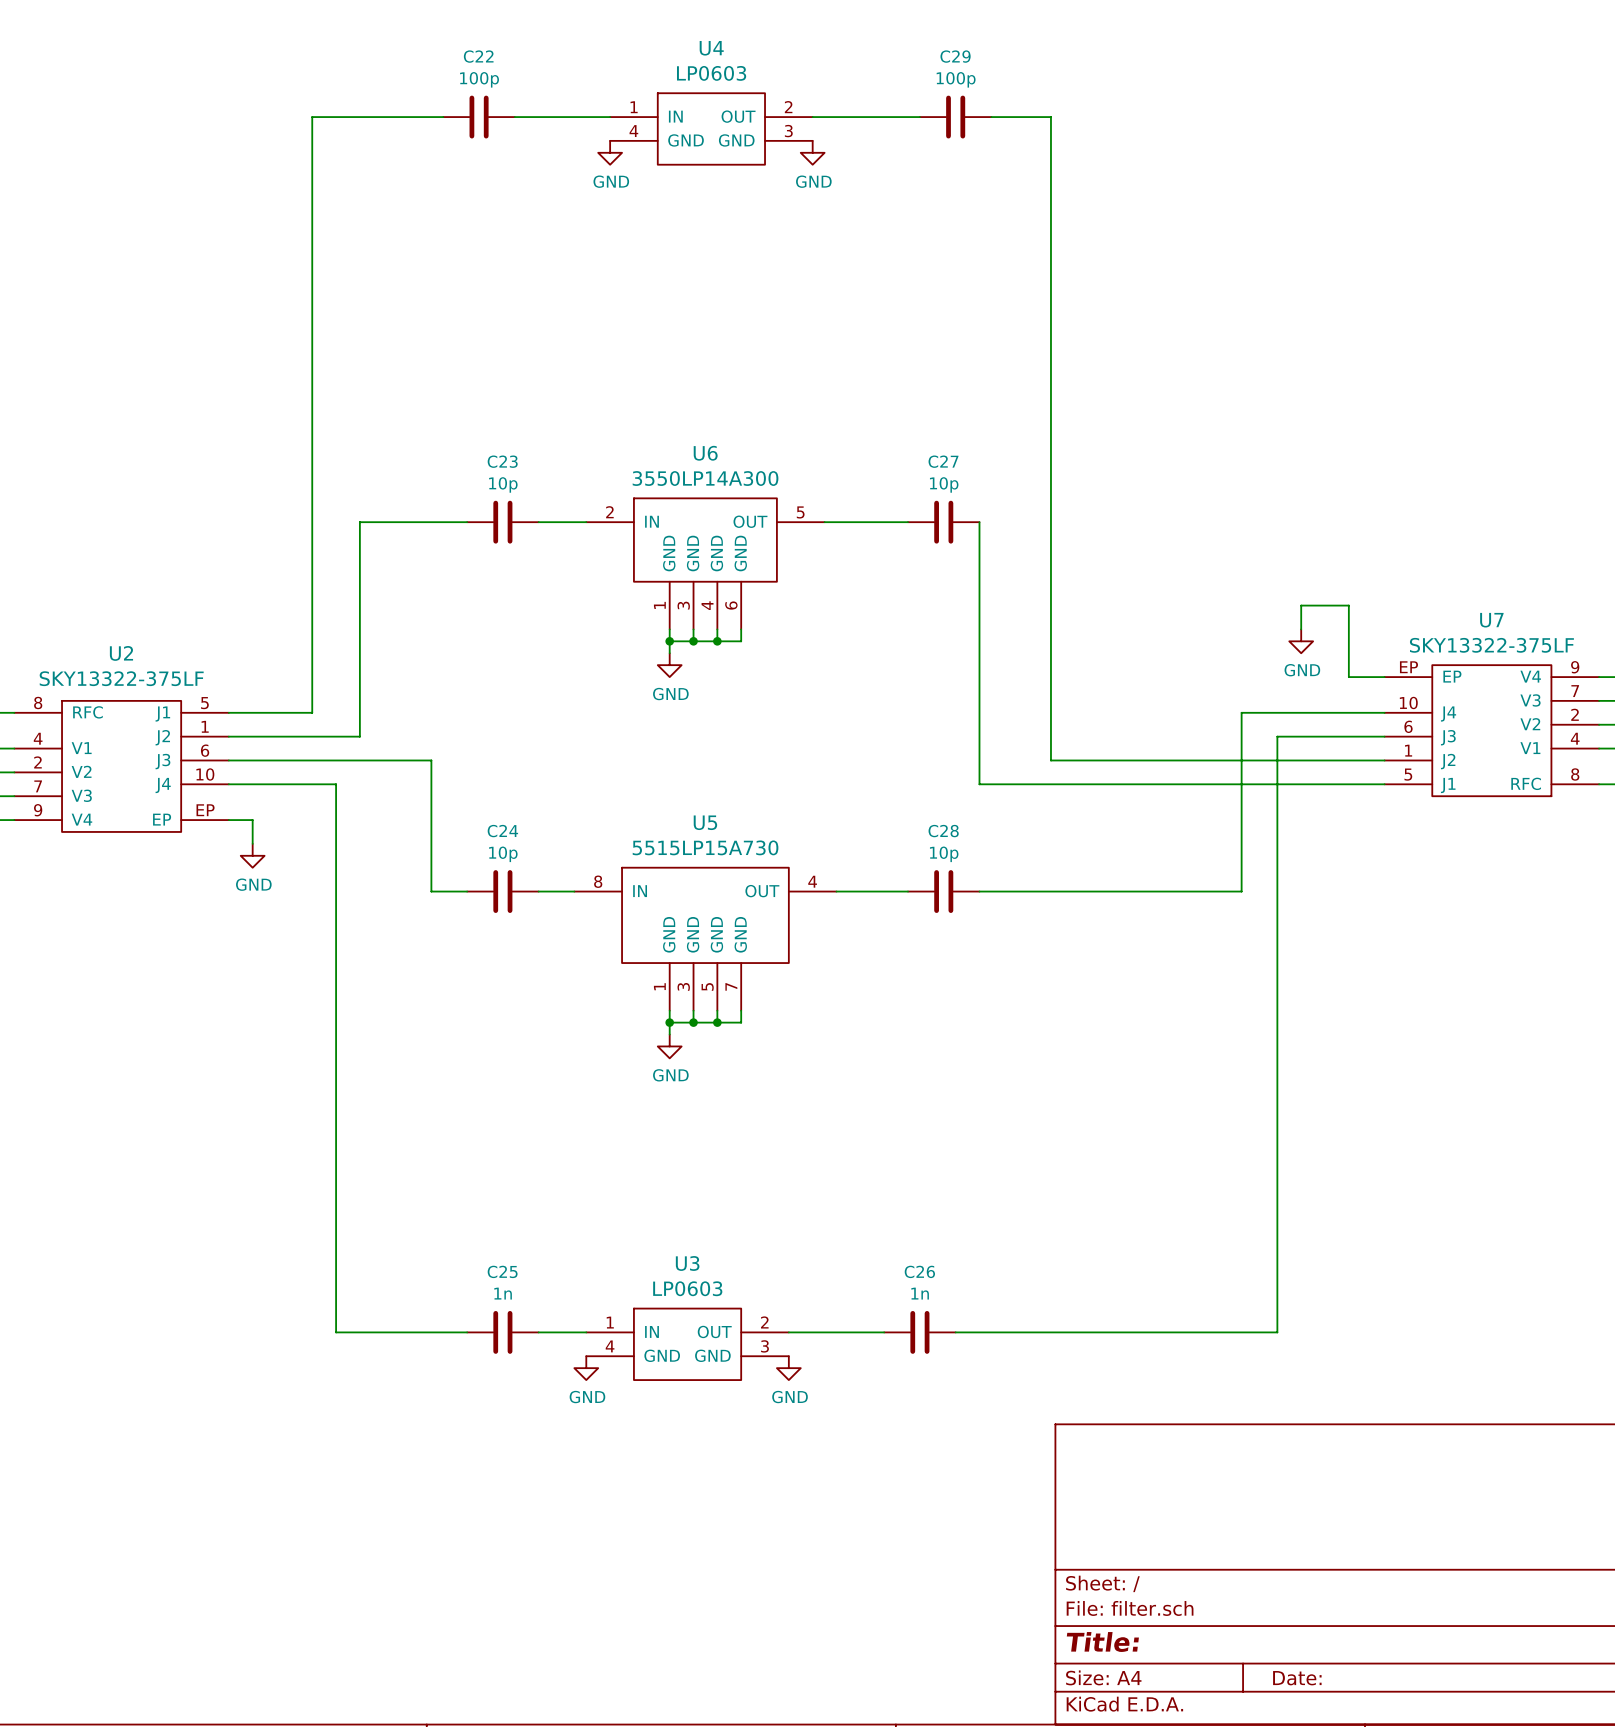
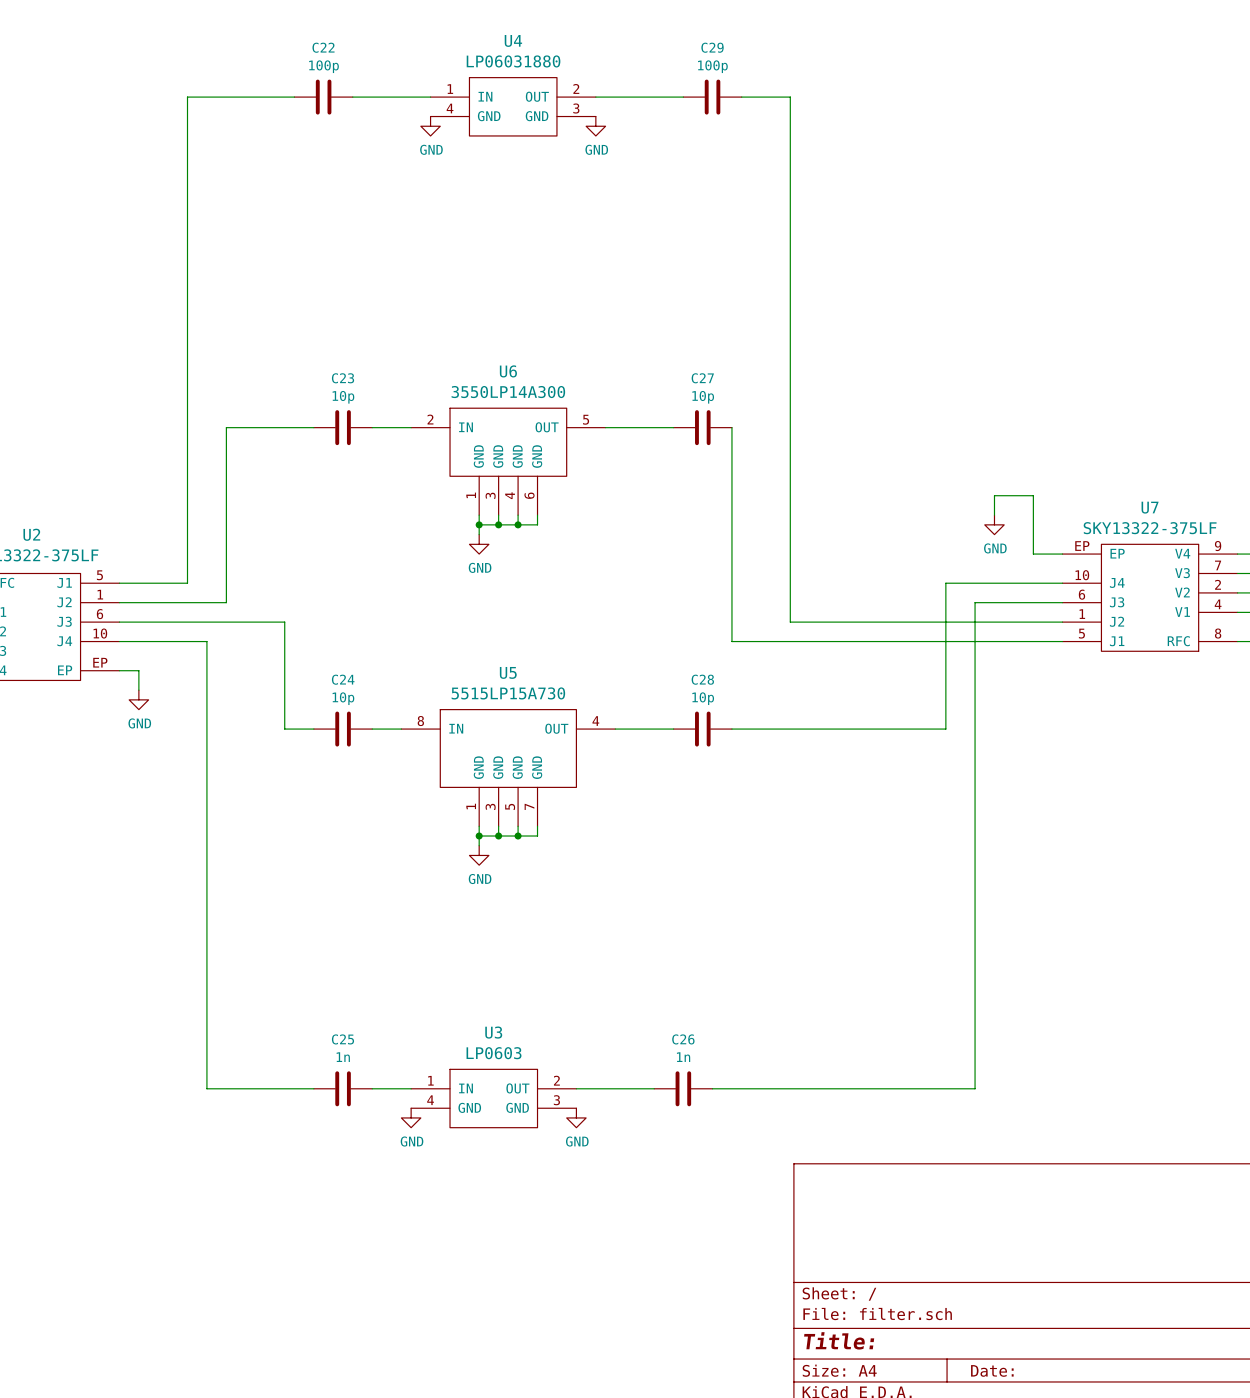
U4 value: LP0603 (711, 73) -> LP06031880 (513, 61)

